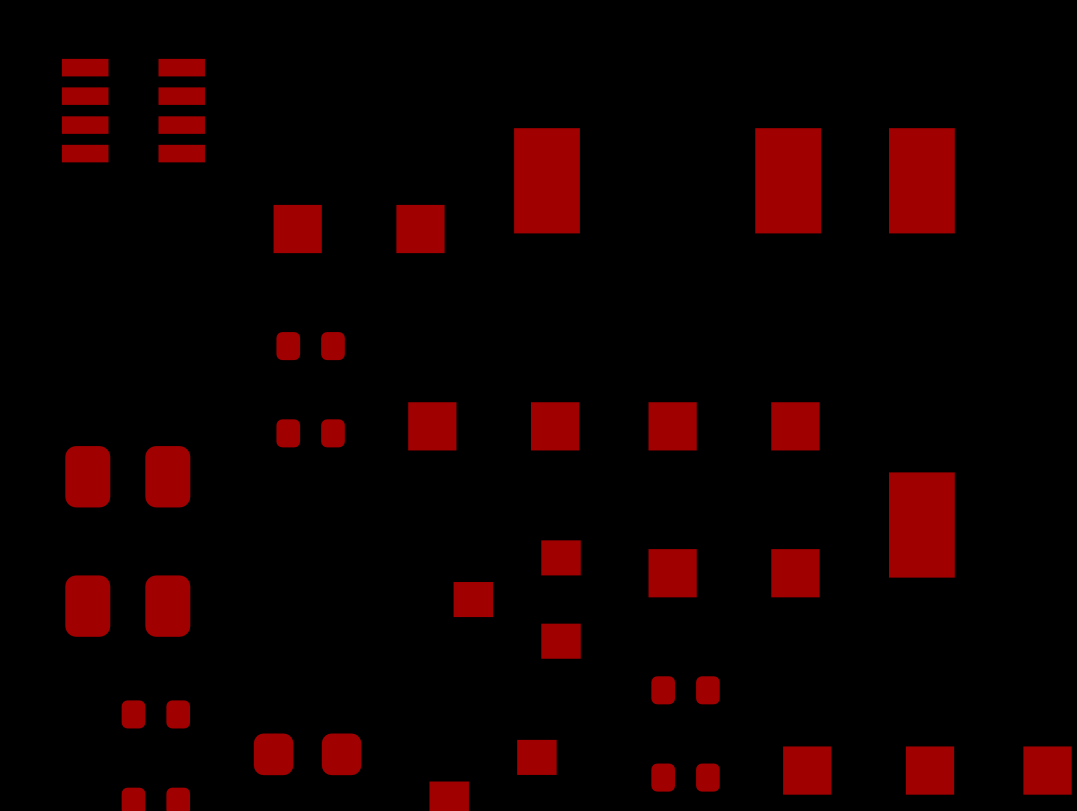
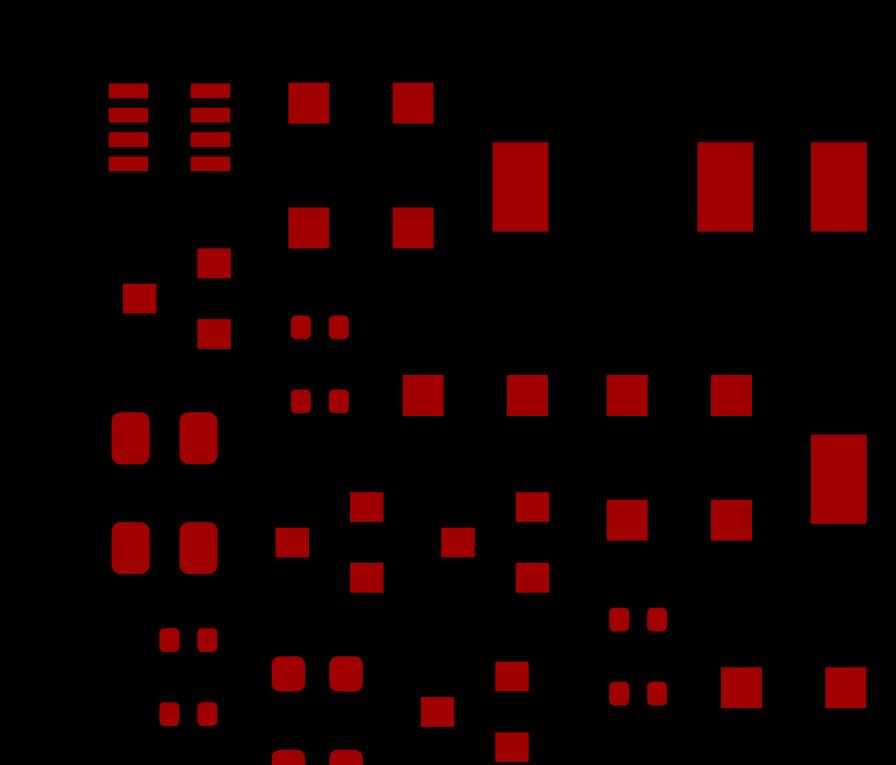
part: none -> (360, 103)
part: none -> (176, 298)
part: none -> (329, 542)

